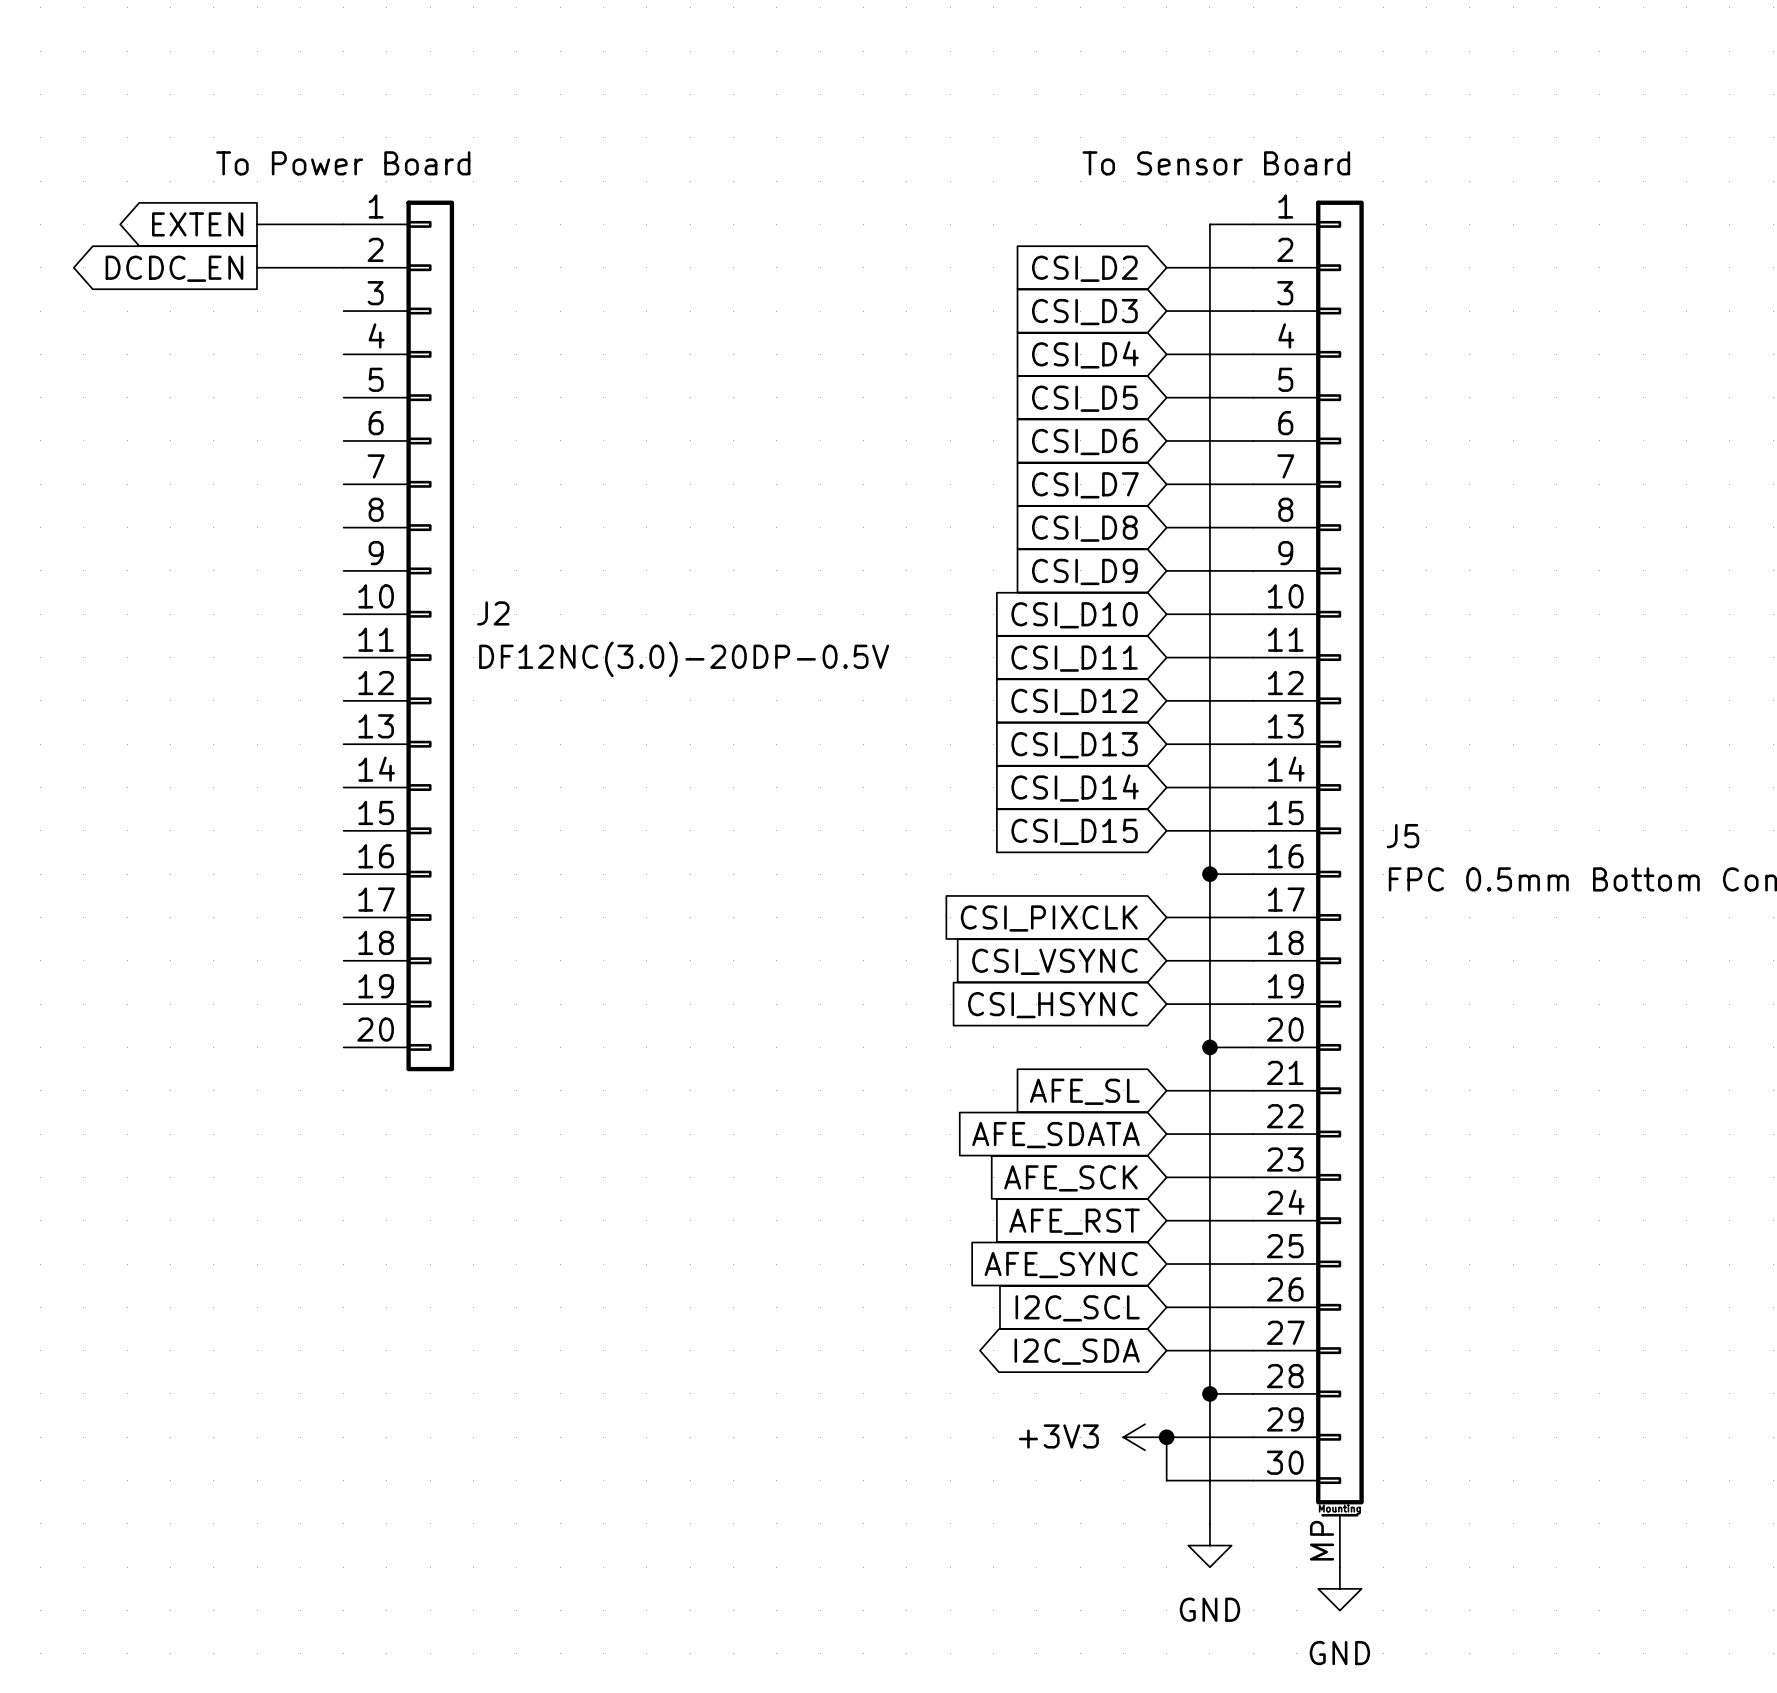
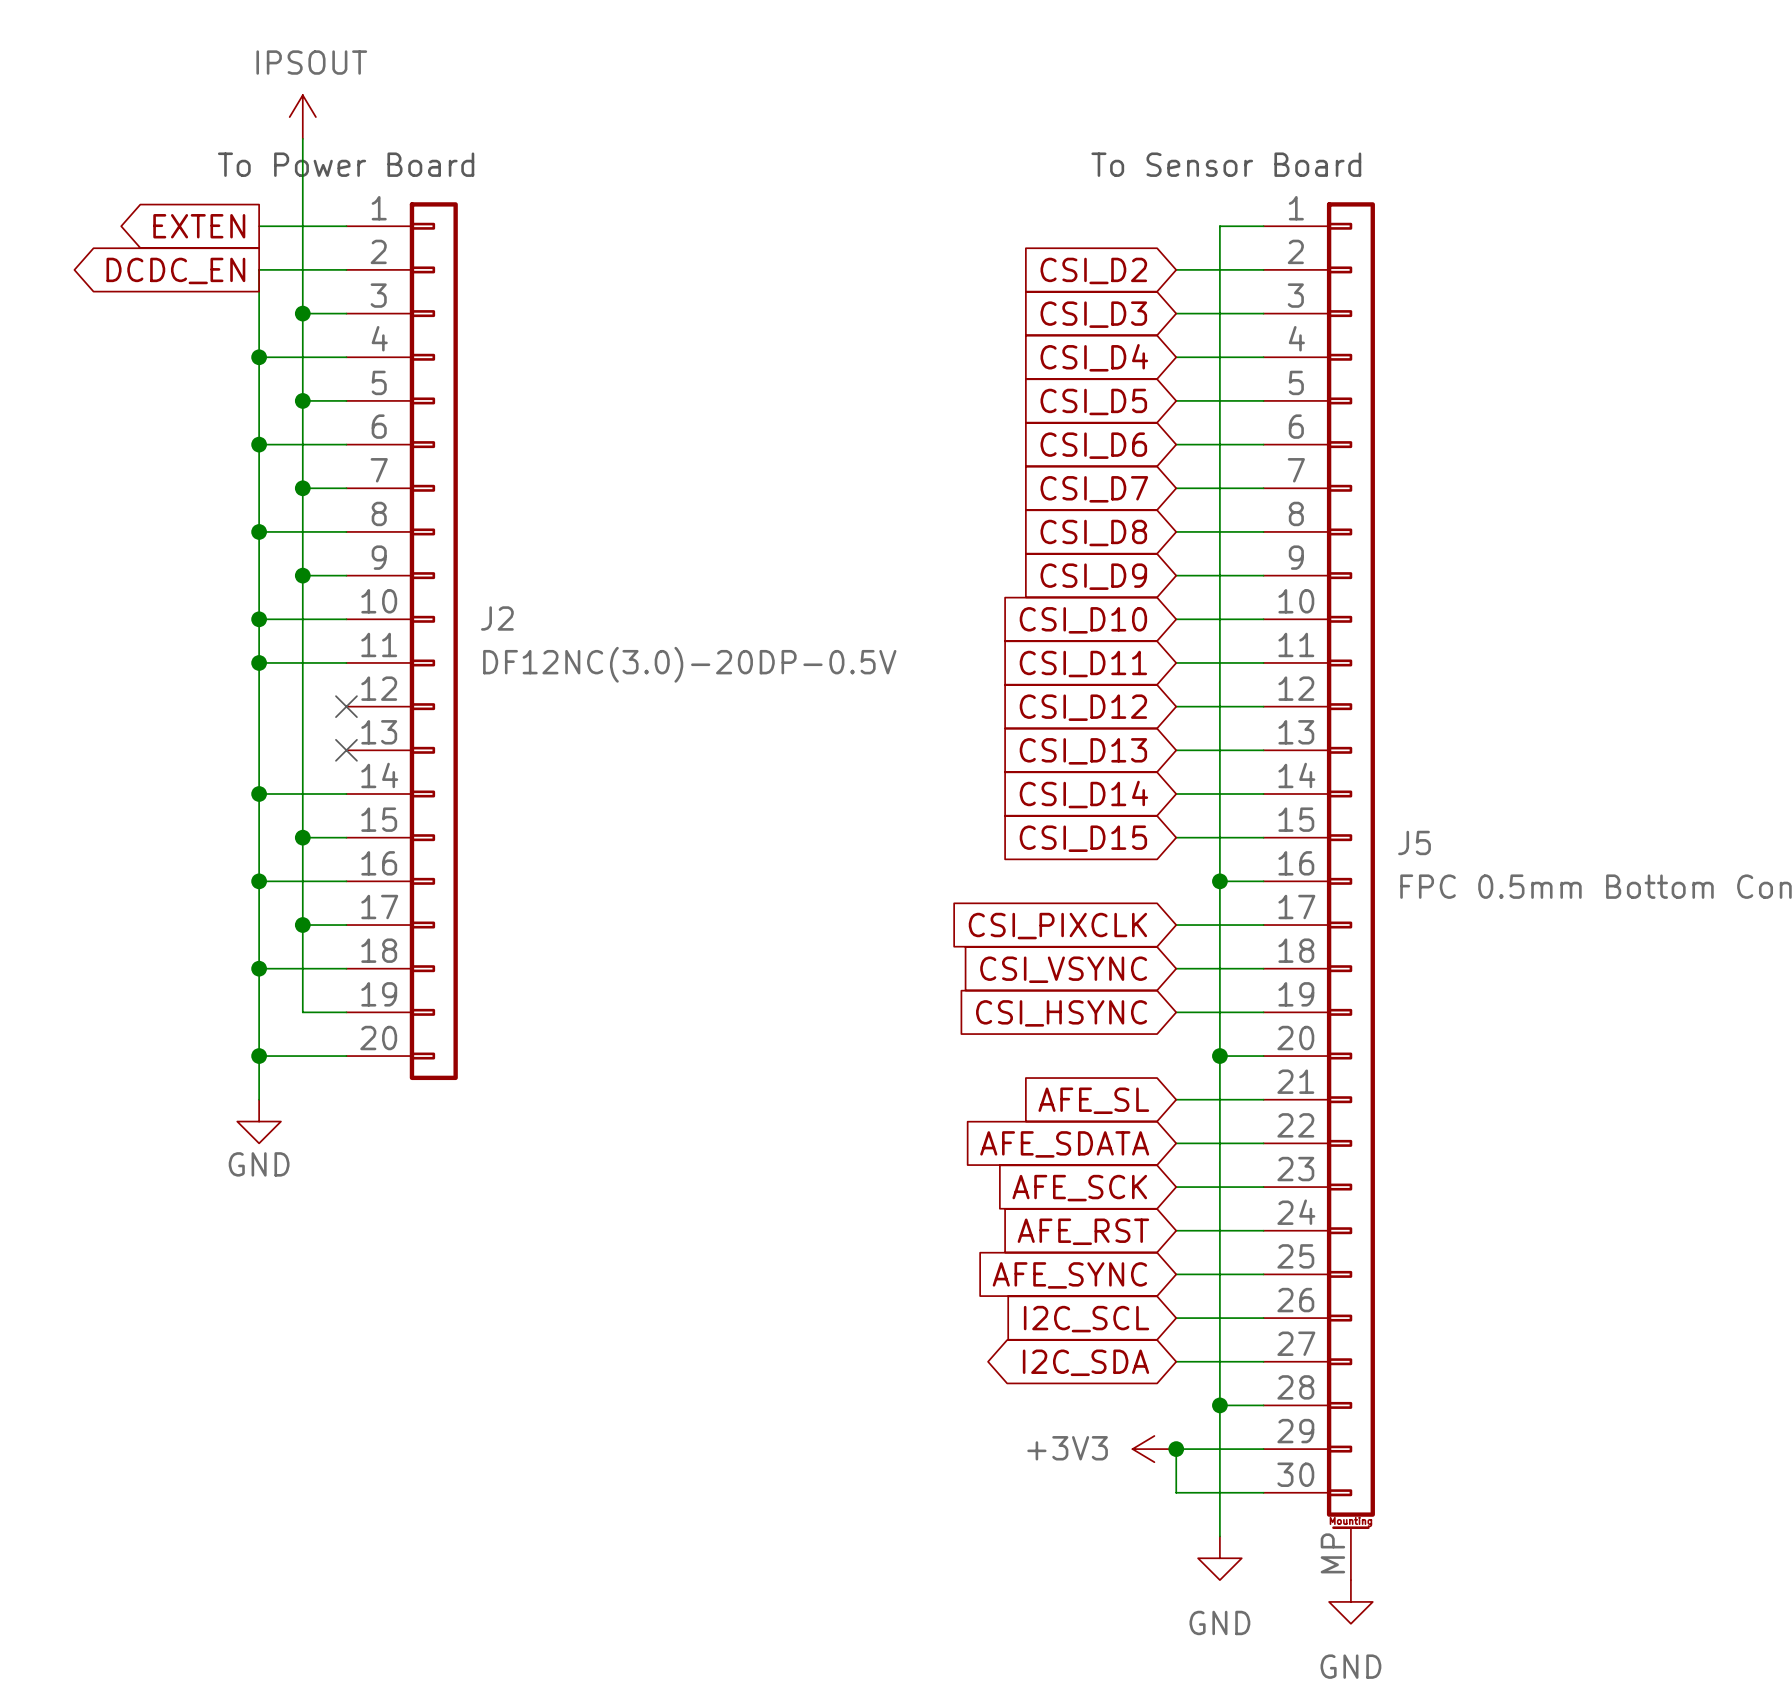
power symbol: none -> IPSOUT (302, 117)
wire: none -> (302, 138) (302, 1012) (346, 1012)
wire: none -> (259, 269) (259, 1099)
wire: none -> (302, 313) (346, 313)
junction: none -> (302, 313)
wire: none -> (259, 357) (346, 357)
junction: none -> (259, 357)
wire: none -> (302, 400) (346, 400)
junction: none -> (302, 400)
wire: none -> (259, 444) (346, 444)
junction: none -> (259, 444)
wire: none -> (302, 488) (346, 488)
junction: none -> (302, 488)
wire: none -> (259, 531) (346, 531)
junction: none -> (259, 531)
wire: none -> (302, 575) (346, 575)
junction: none -> (302, 575)
wire: none -> (259, 619) (346, 619)
junction: none -> (259, 619)
wire: none -> (259, 662) (346, 662)
junction: none -> (259, 662)
no-connect mark: none -> (346, 706)
no-connect mark: none -> (346, 750)
wire: none -> (259, 793) (346, 793)
junction: none -> (259, 793)
wire: none -> (302, 837) (346, 837)
junction: none -> (302, 837)
wire: none -> (259, 881) (346, 881)
junction: none -> (259, 881)
wire: none -> (302, 925) (346, 925)
junction: none -> (302, 925)
wire: none -> (259, 968) (346, 968)
junction: none -> (259, 968)
wire: none -> (259, 1056) (346, 1056)
junction: none -> (259, 1056)
power symbol: none -> GND (259, 1121)

